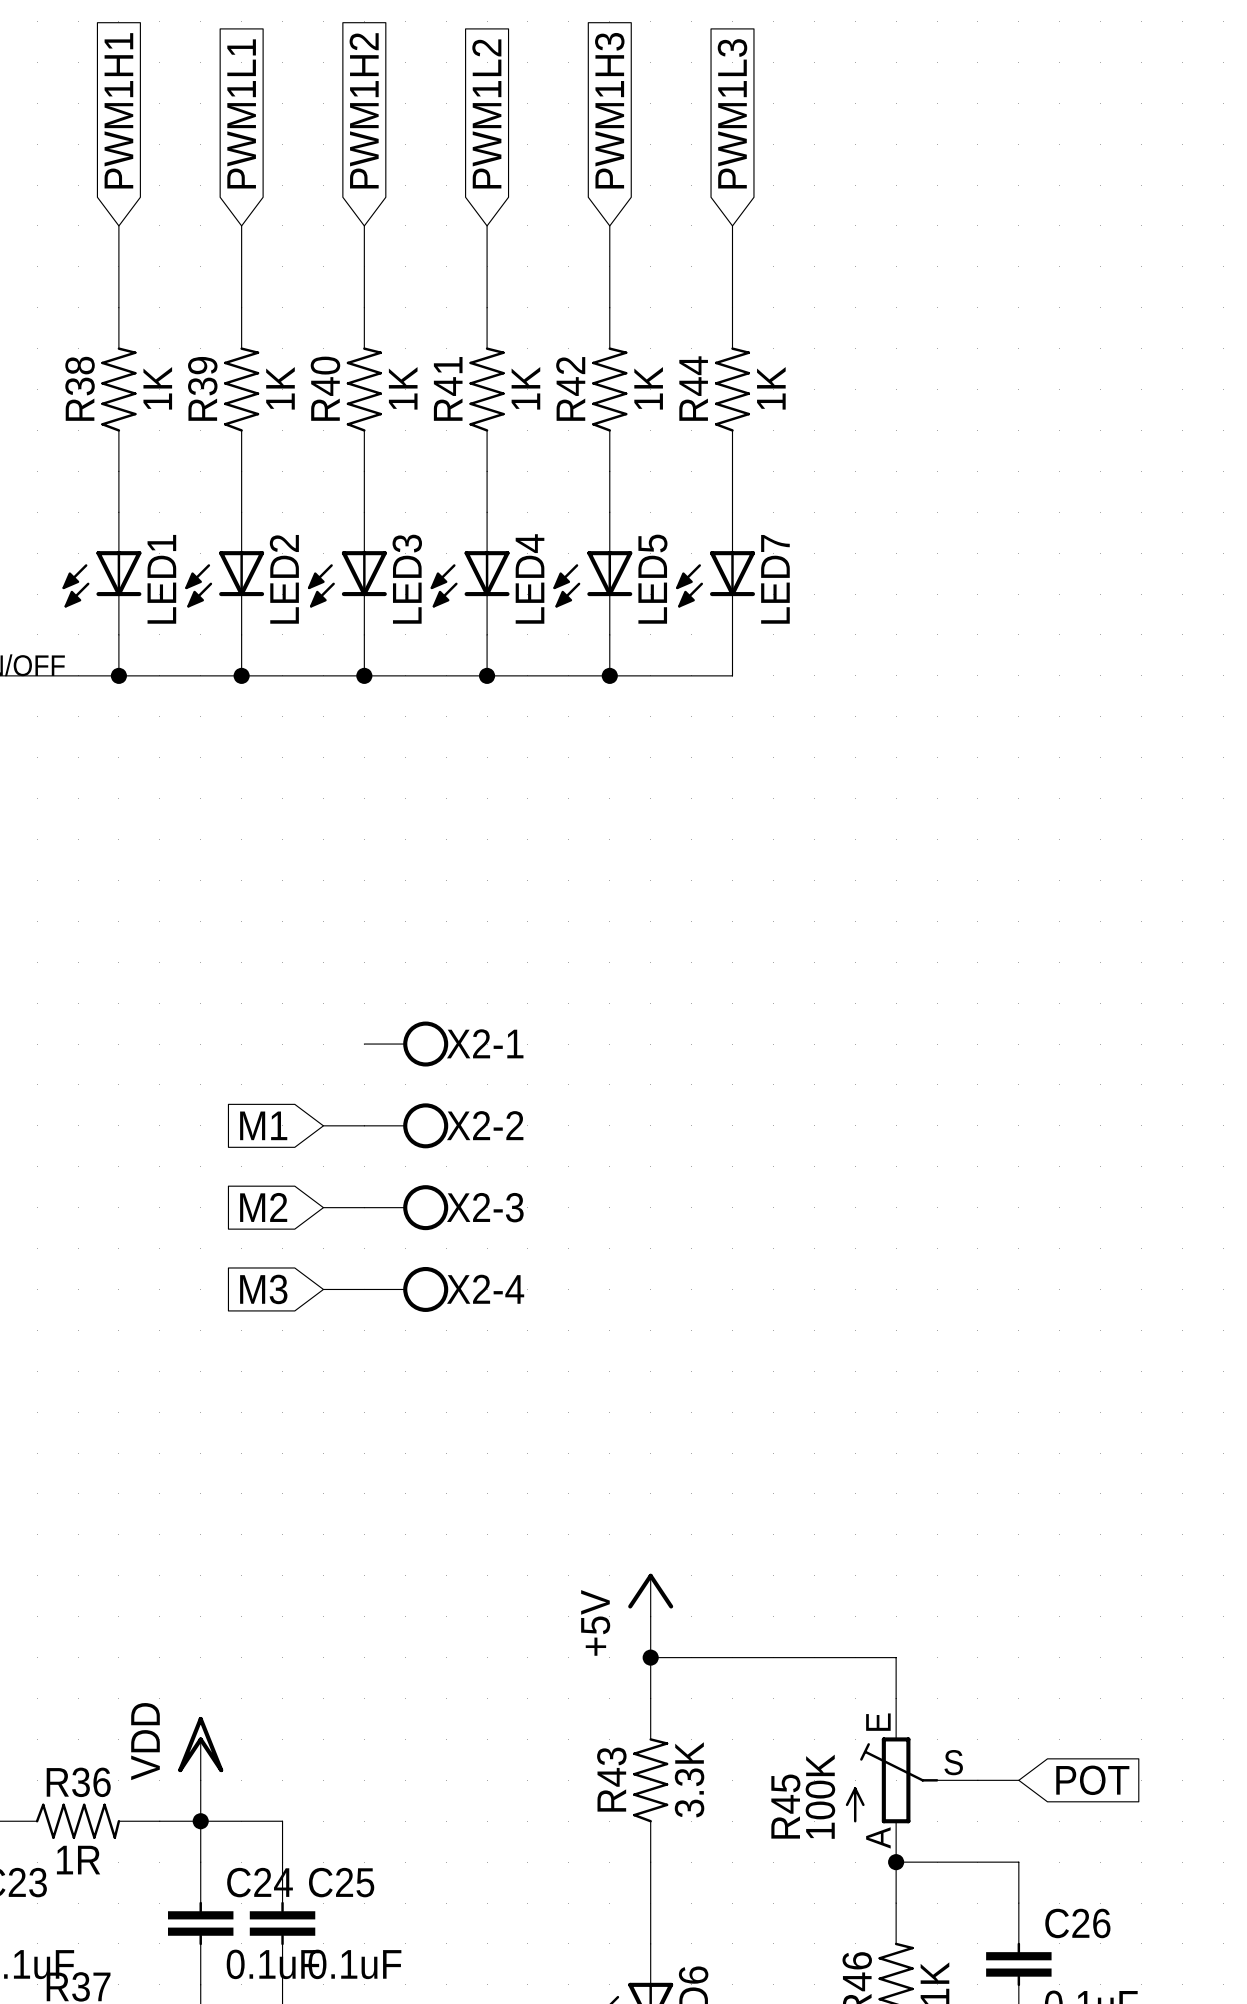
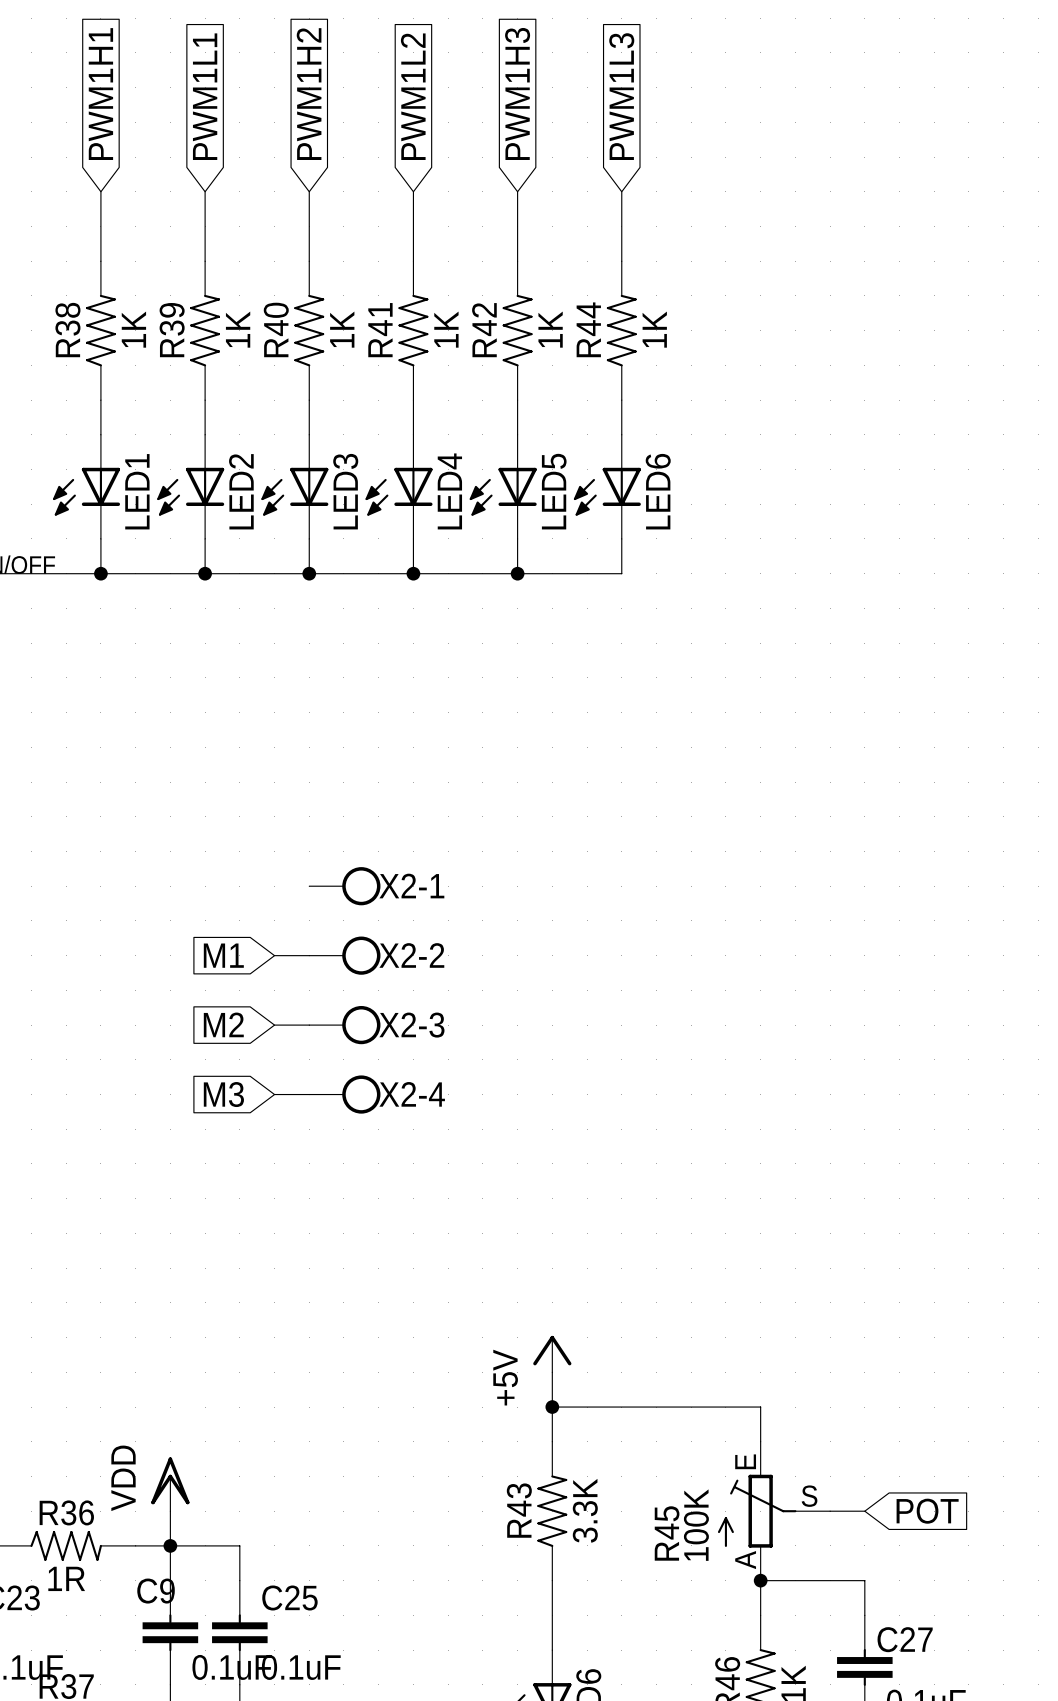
LED7 name: LED7 (775, 579) -> LED6 (658, 491)
C24 name: C24 (260, 1882) -> C9 (156, 1591)
C26 name: C26 (1077, 1923) -> C27 (905, 1639)

